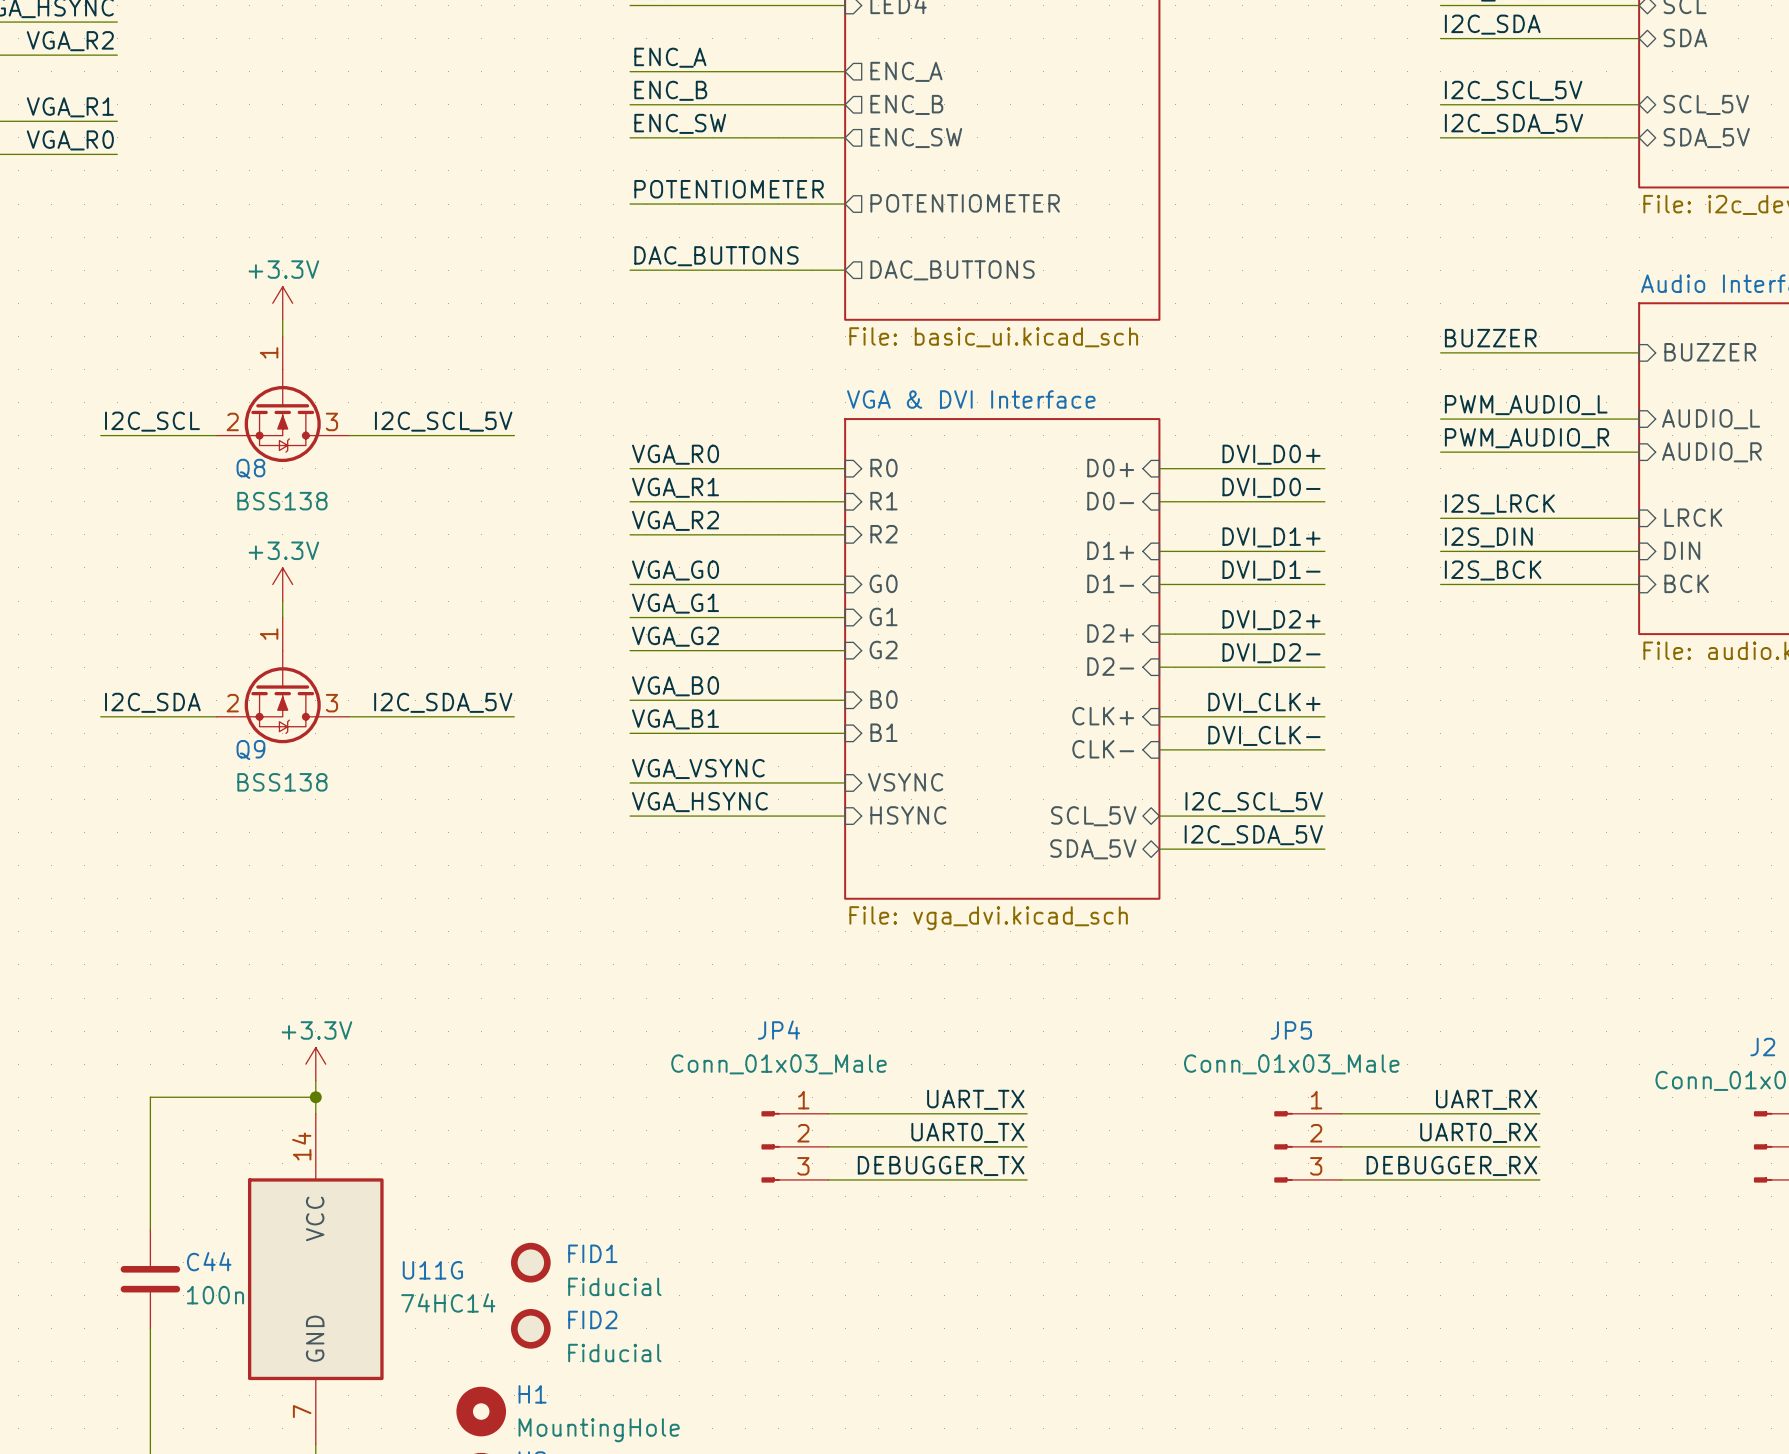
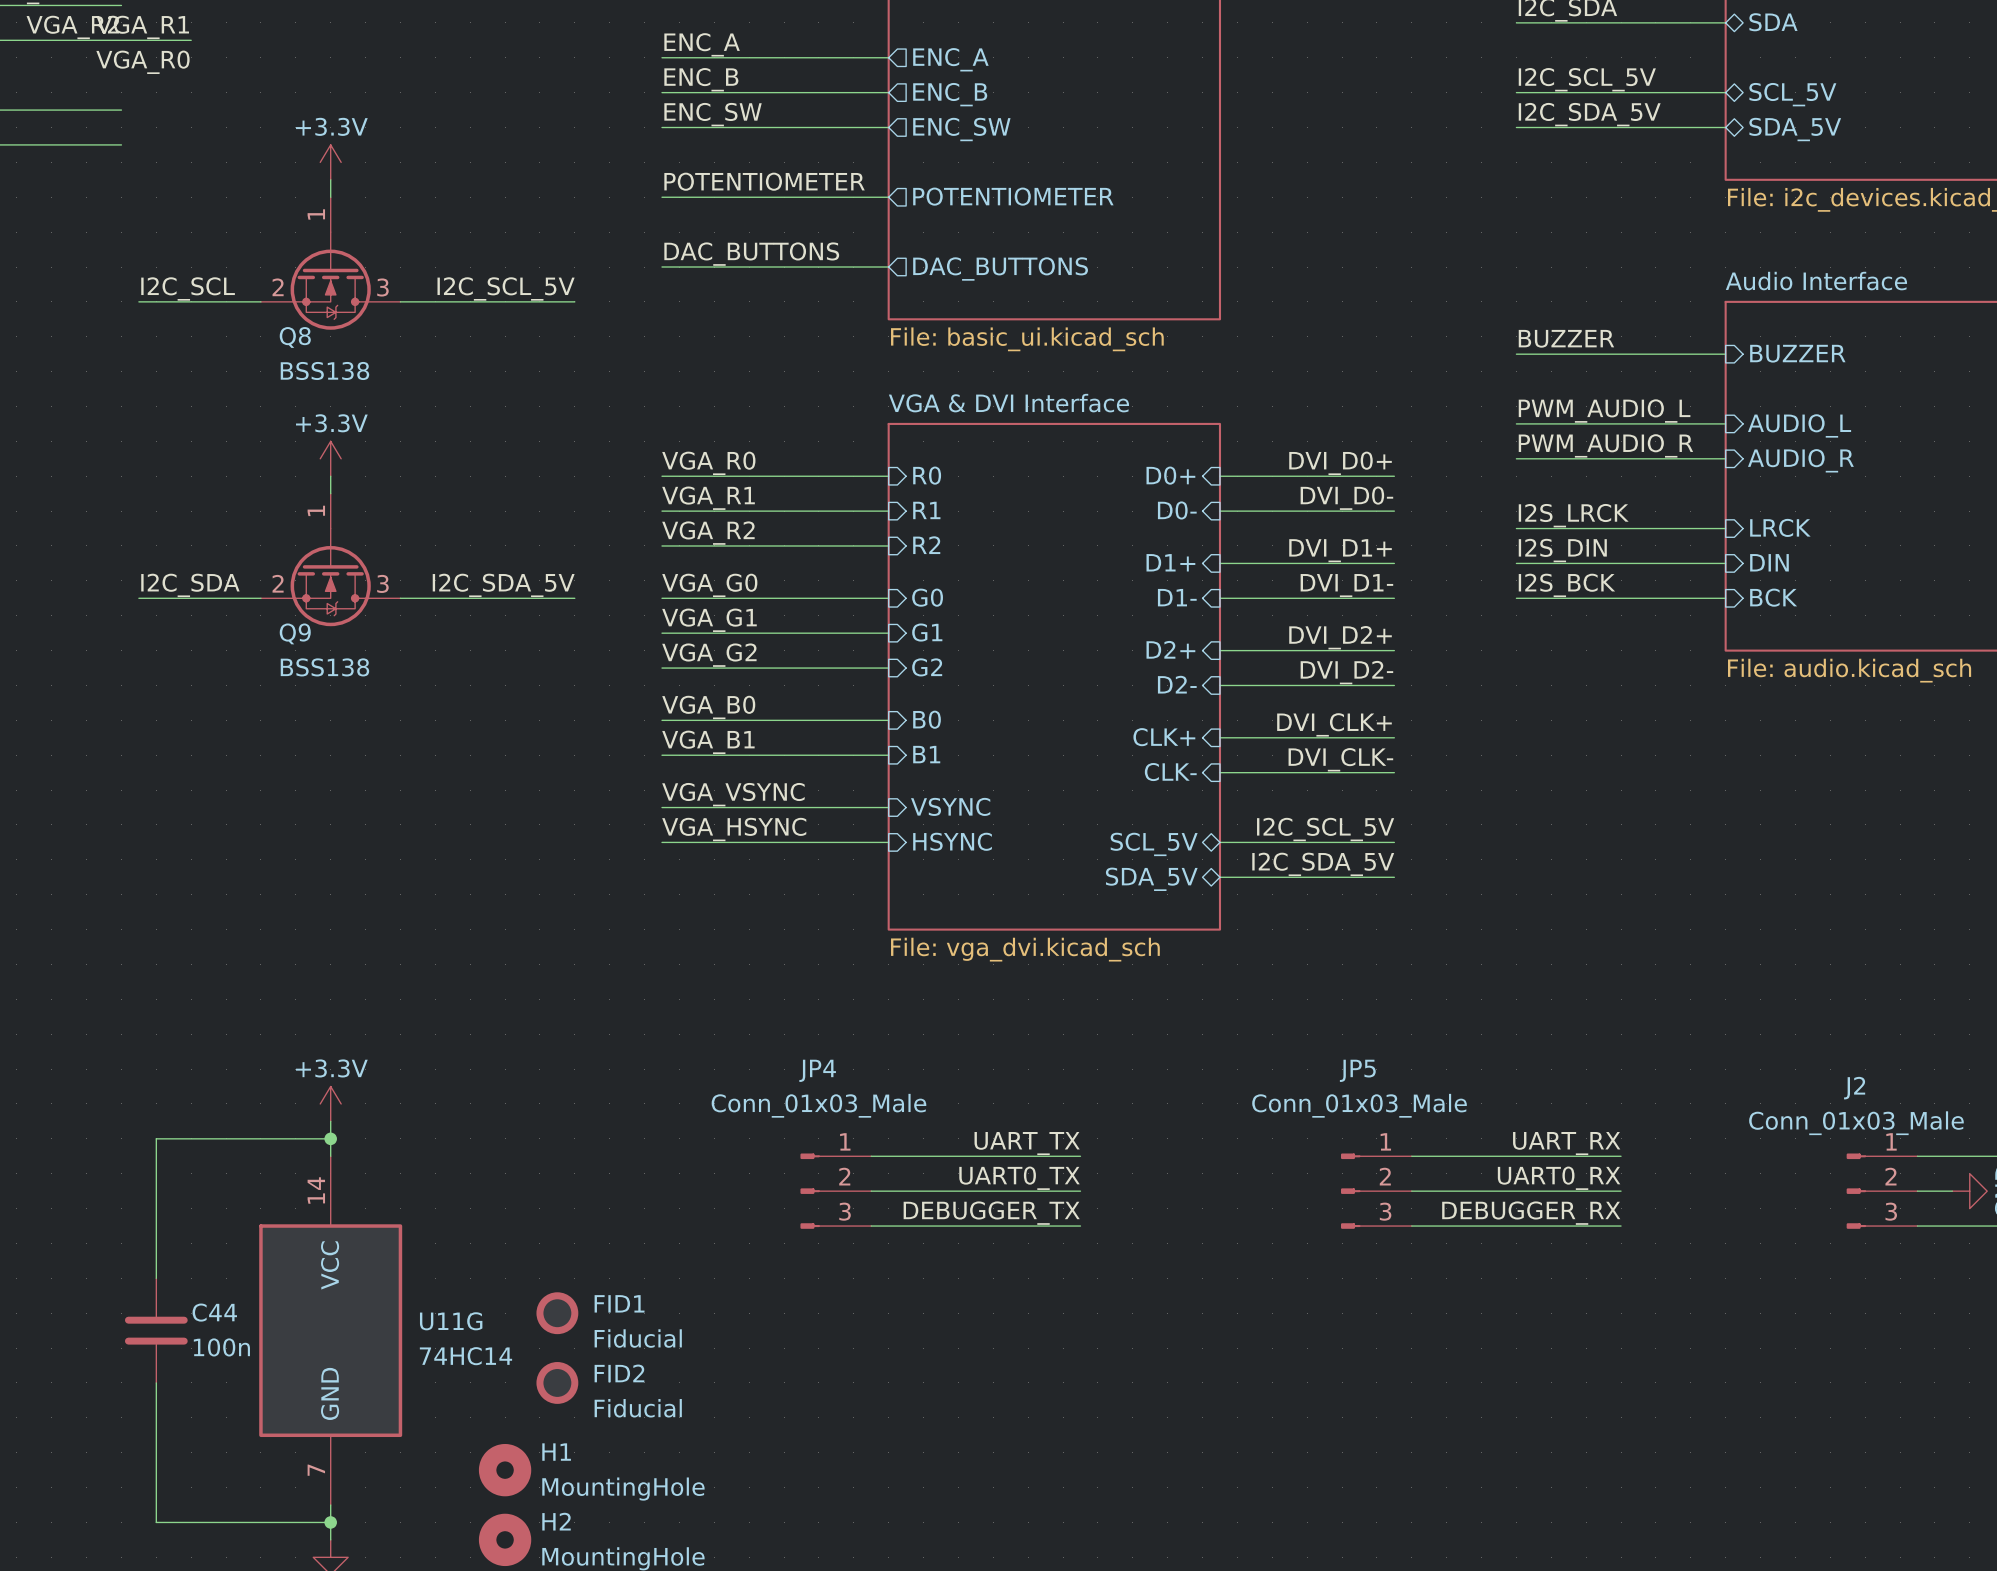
wire: none -> (121, 40) (191, 40)
label position: VGA_R1 (70, 107) -> VGA_R1 (142, 27)
label position: VGA_R0 (70, 140) -> VGA_R0 (142, 62)
power symbol: none -> +3.3V (330, 162)
power symbol: +3.3V (282, 303) -> none
wire: (282, 319) (282, 336) -> (330, 179) (330, 197)
Q8 position: (282, 399) -> (330, 263)
label position: I2C_SCL (152, 421) -> I2C_SCL (188, 288)
label position: I2C_SCL_5V (443, 421) -> I2C_SCL_5V (506, 288)
wire: (100, 435) (216, 435) -> (138, 301) (260, 301)
wire: (348, 435) (514, 435) -> (400, 301) (574, 301)
power symbol: none -> +3.3V (330, 458)
power symbol: +3.3V (282, 584) -> none
wire: (282, 601) (282, 617) -> (330, 476) (330, 493)
Q9 position: (282, 680) -> (330, 559)
label position: I2C_SDA (152, 702) -> I2C_SDA (190, 585)
label position: I2C_SDA_5V (443, 702) -> I2C_SDA_5V (503, 585)
wire: (100, 716) (216, 716) -> (138, 598) (260, 598)
wire: (348, 716) (514, 716) -> (400, 598) (574, 598)

